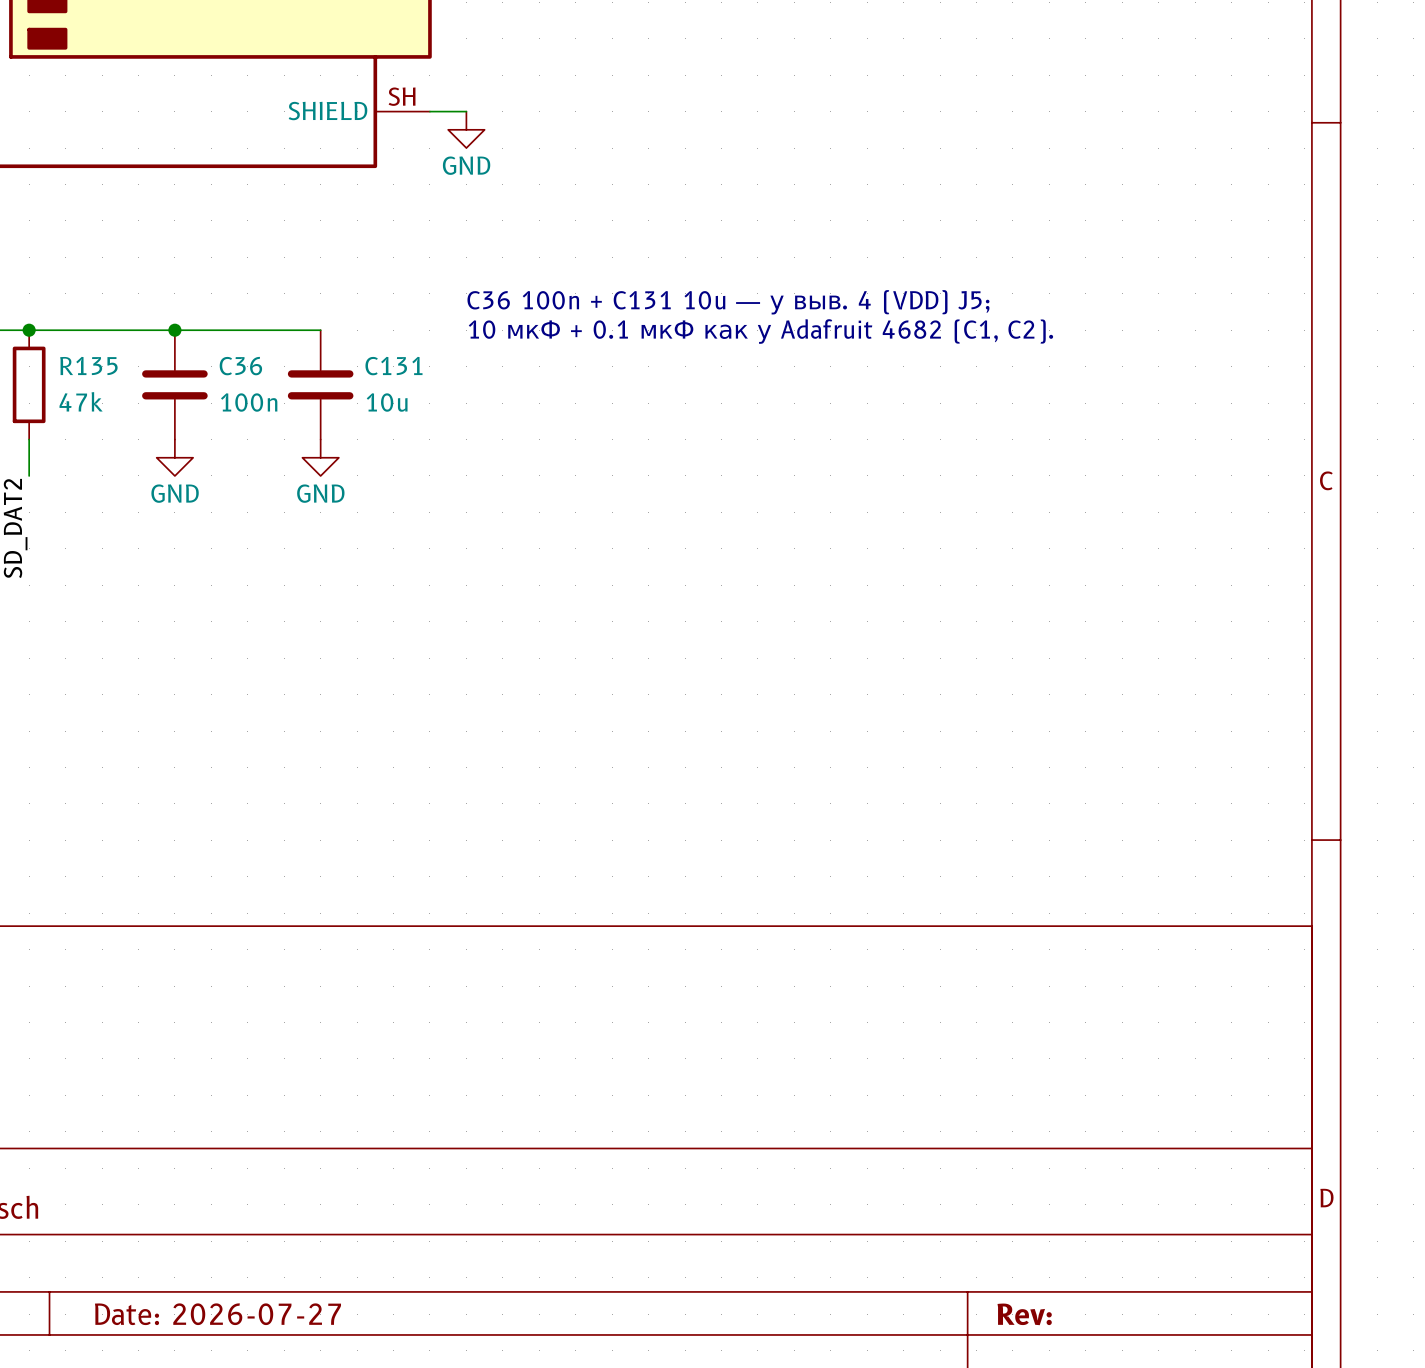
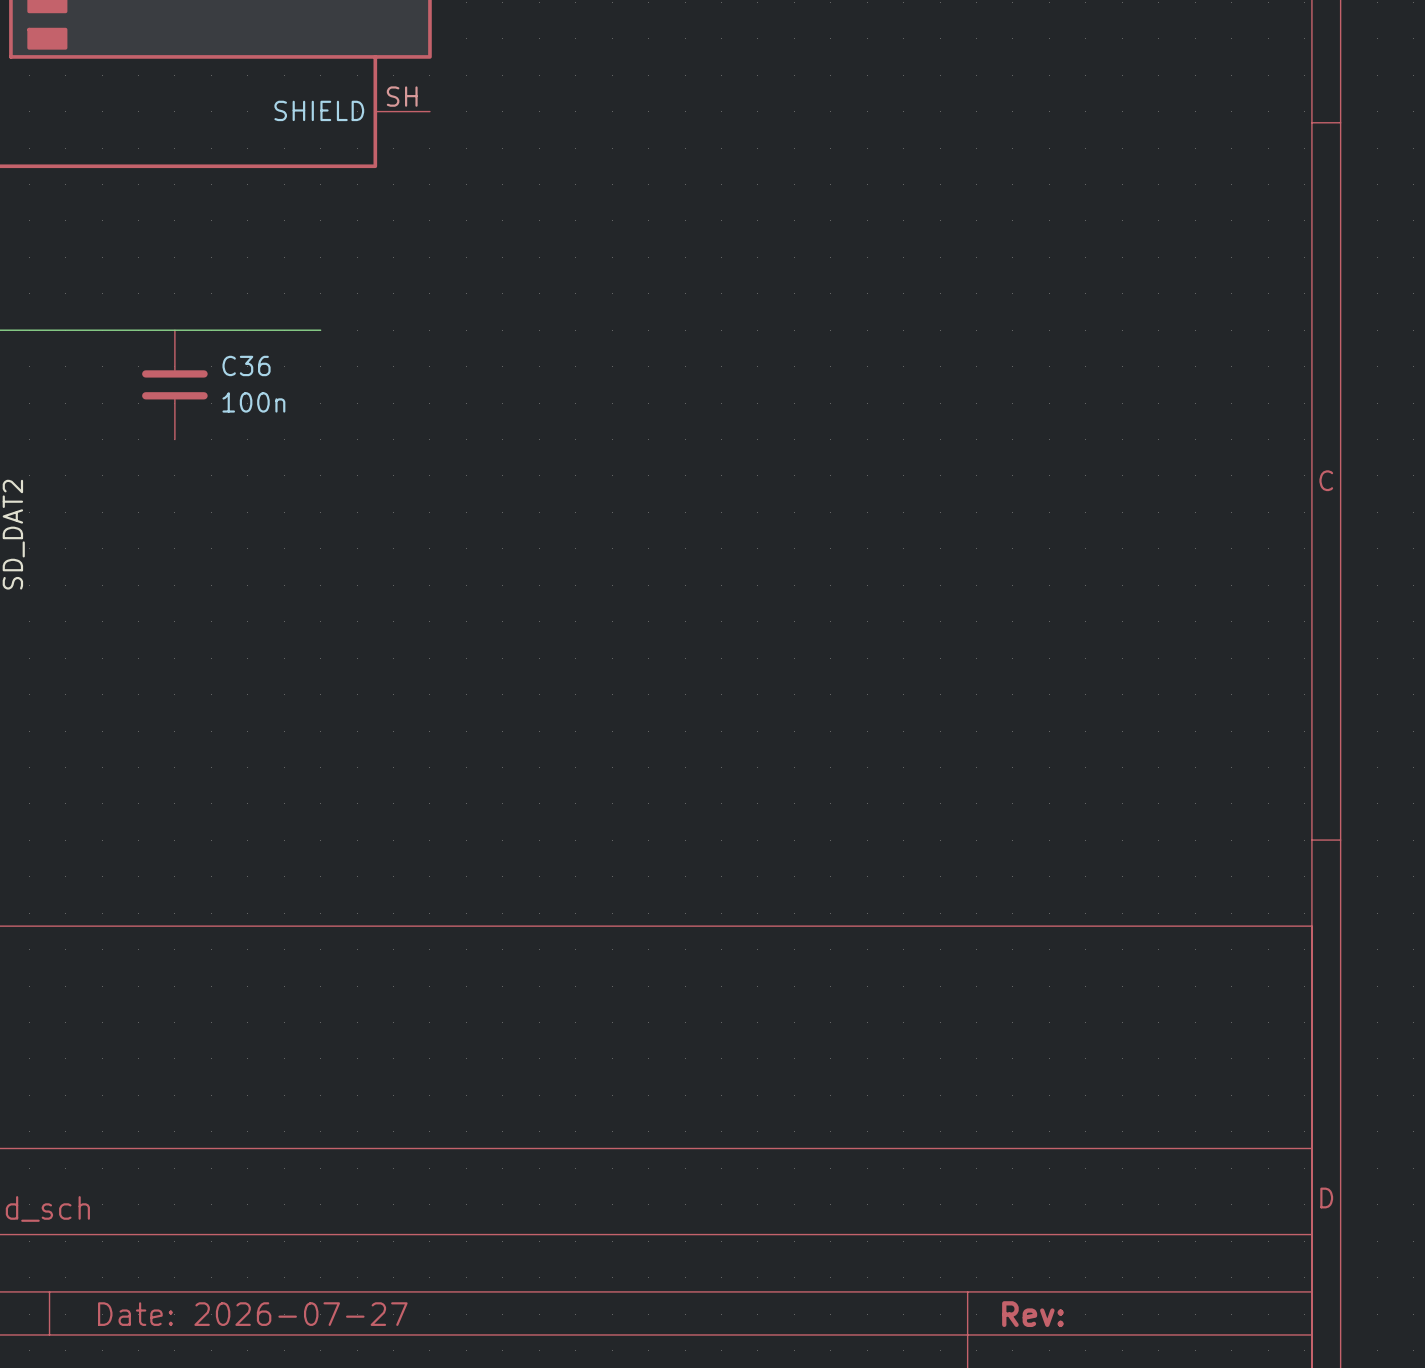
wire: (429, 111) (466, 111) -> none
power symbol: GND (466, 129) -> none
text: C36 100n + C131 10u — у выв. 4 (VDD) J5; (728, 302) -> none
junction: (29, 330) -> none
junction: (174, 330) -> none
text: 10 мкФ + 0.1 мкФ как у Adafruit 4682 (C1, C2). (760, 331) -> none
R135: 47k (29, 384) -> none
C131: 10u (320, 384) -> none
wire: (29, 439) (29, 475) -> none
power symbol: GND (174, 457) -> none
power symbol: GND (320, 457) -> none

